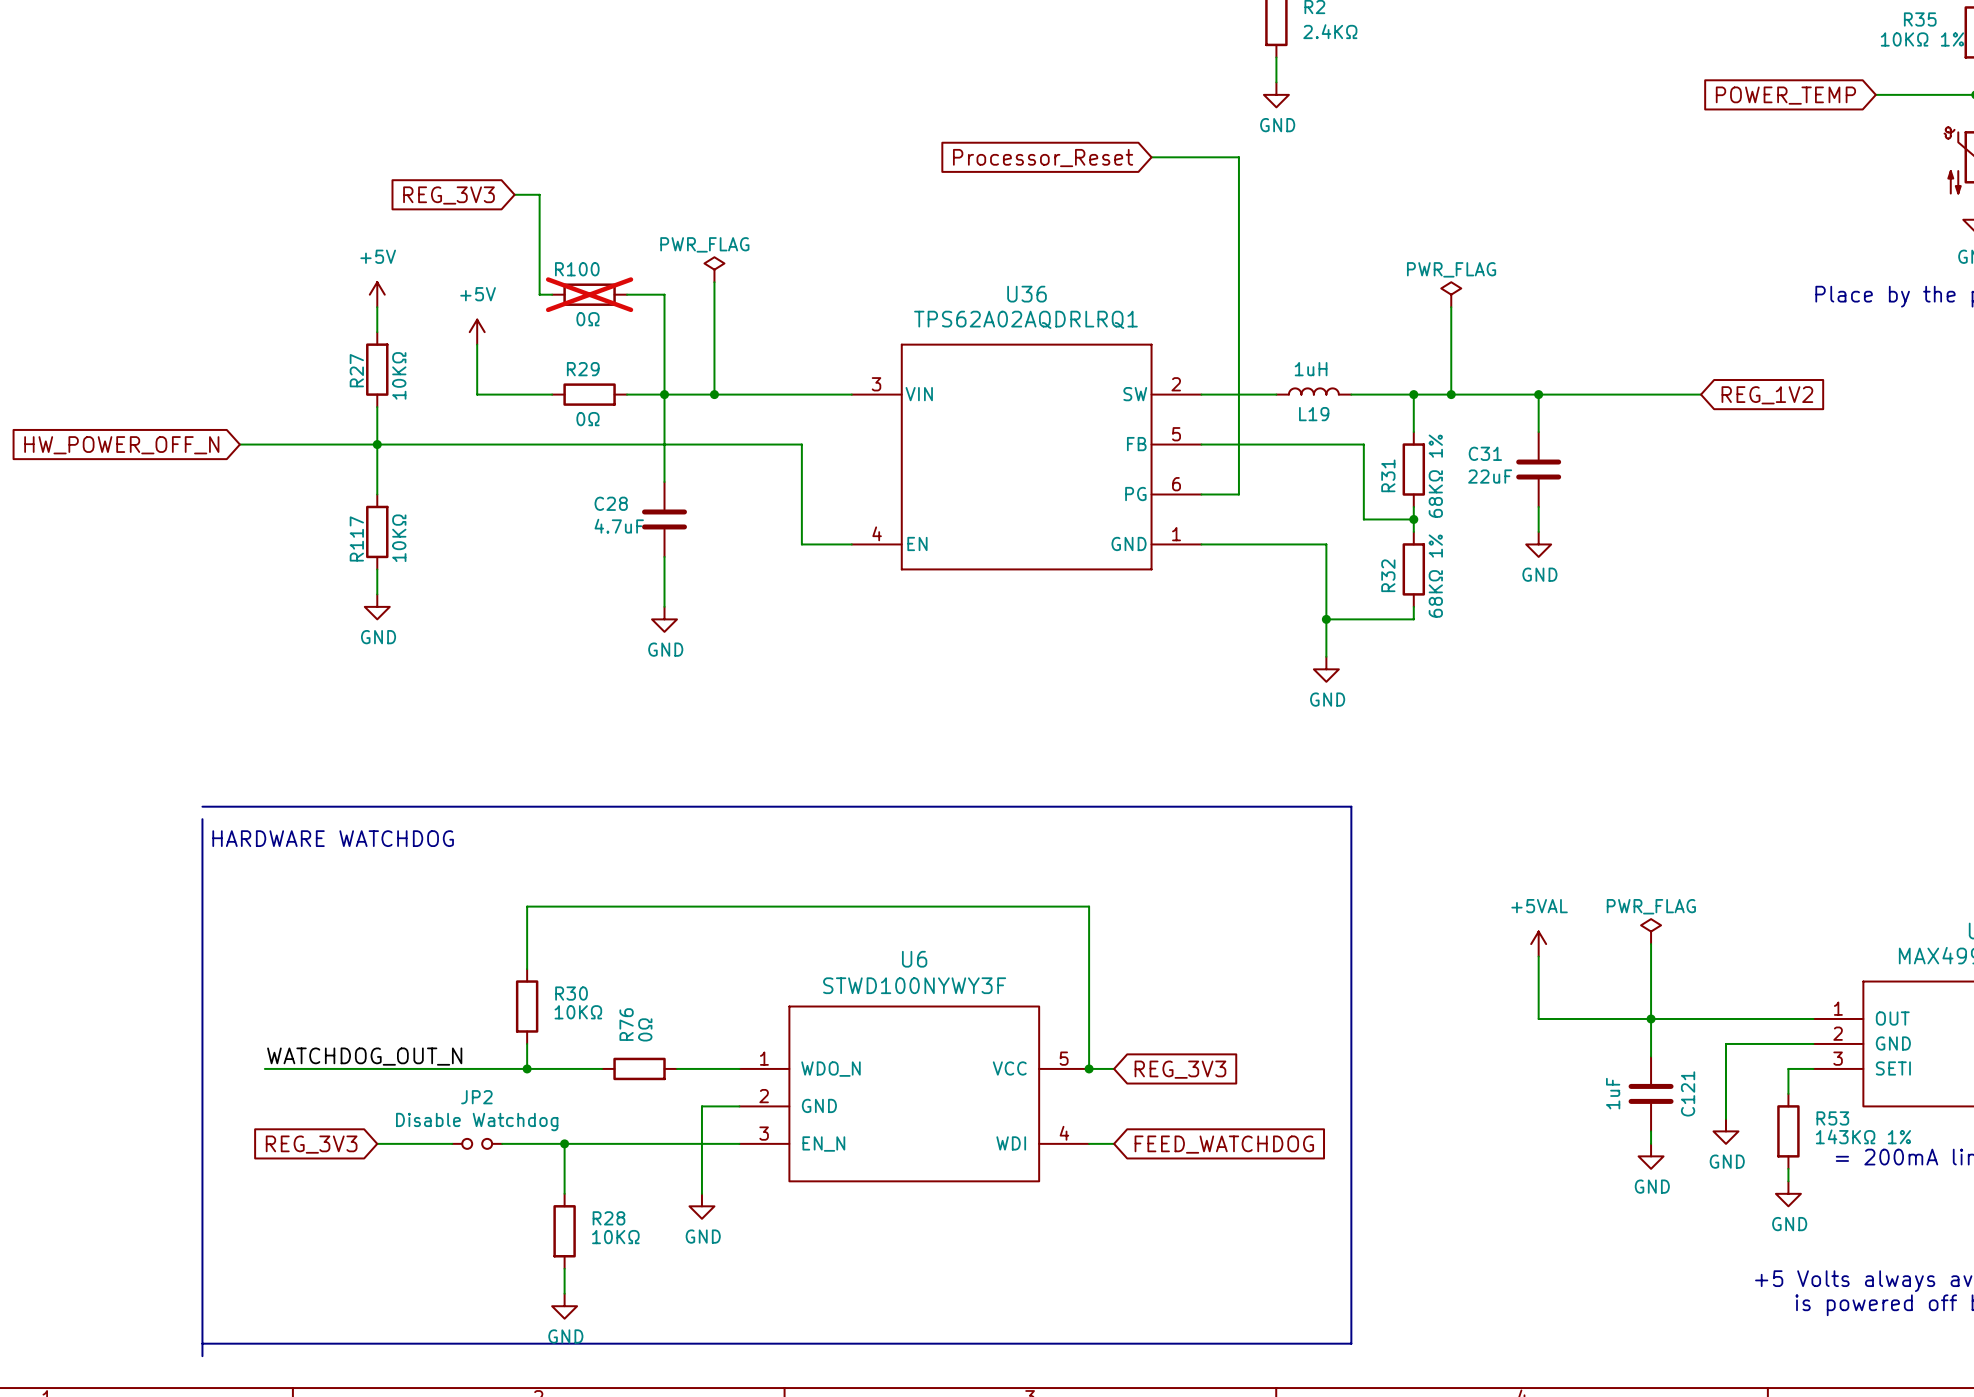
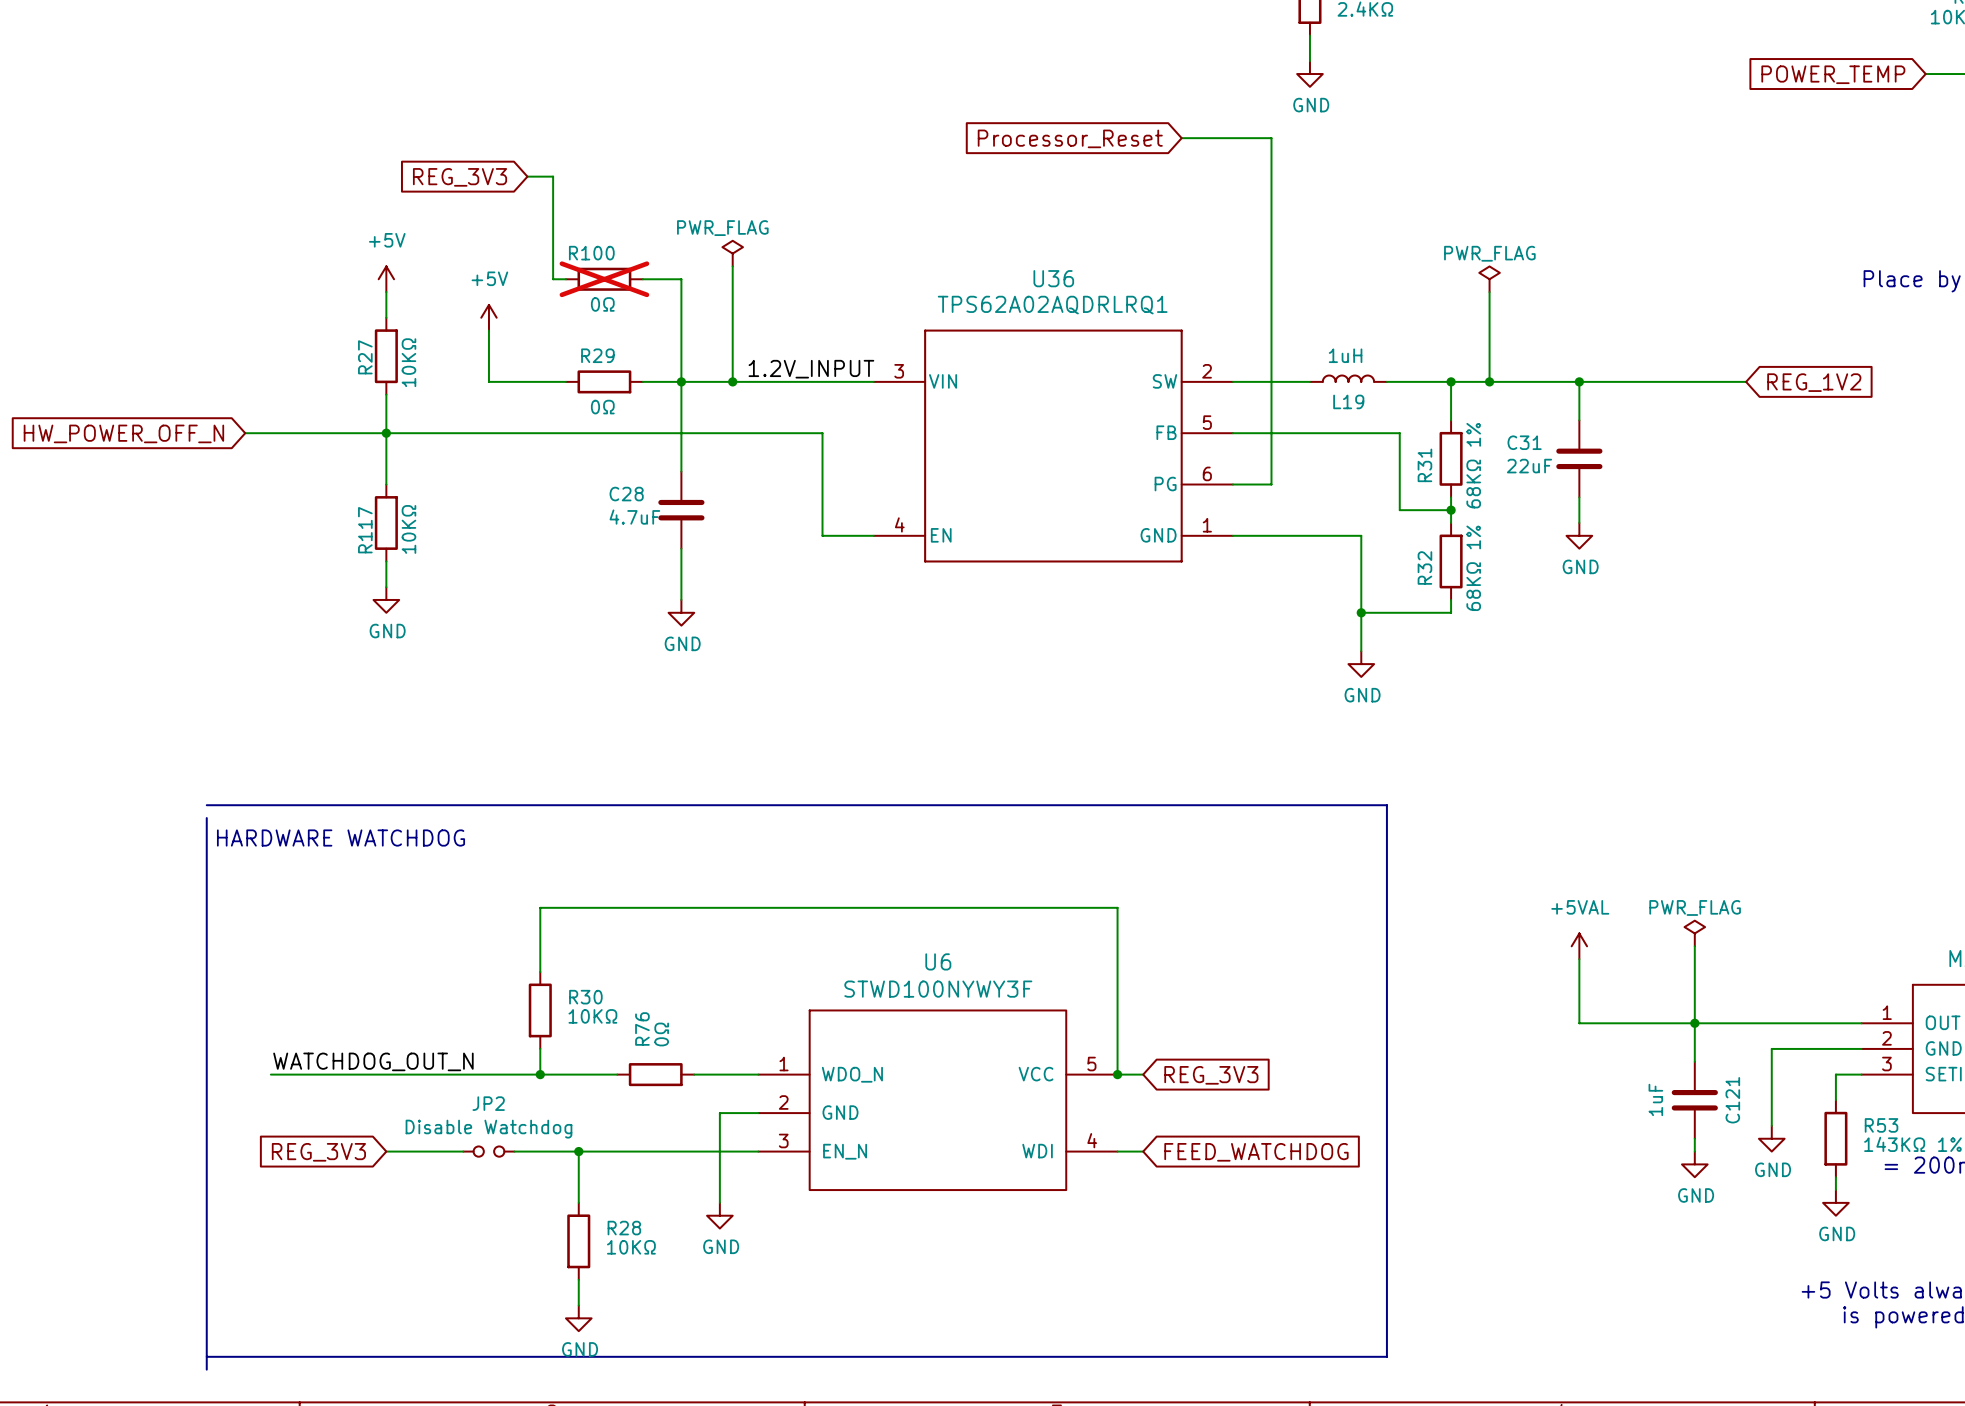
label: none -> 1.2V_INPUT (811, 369)

